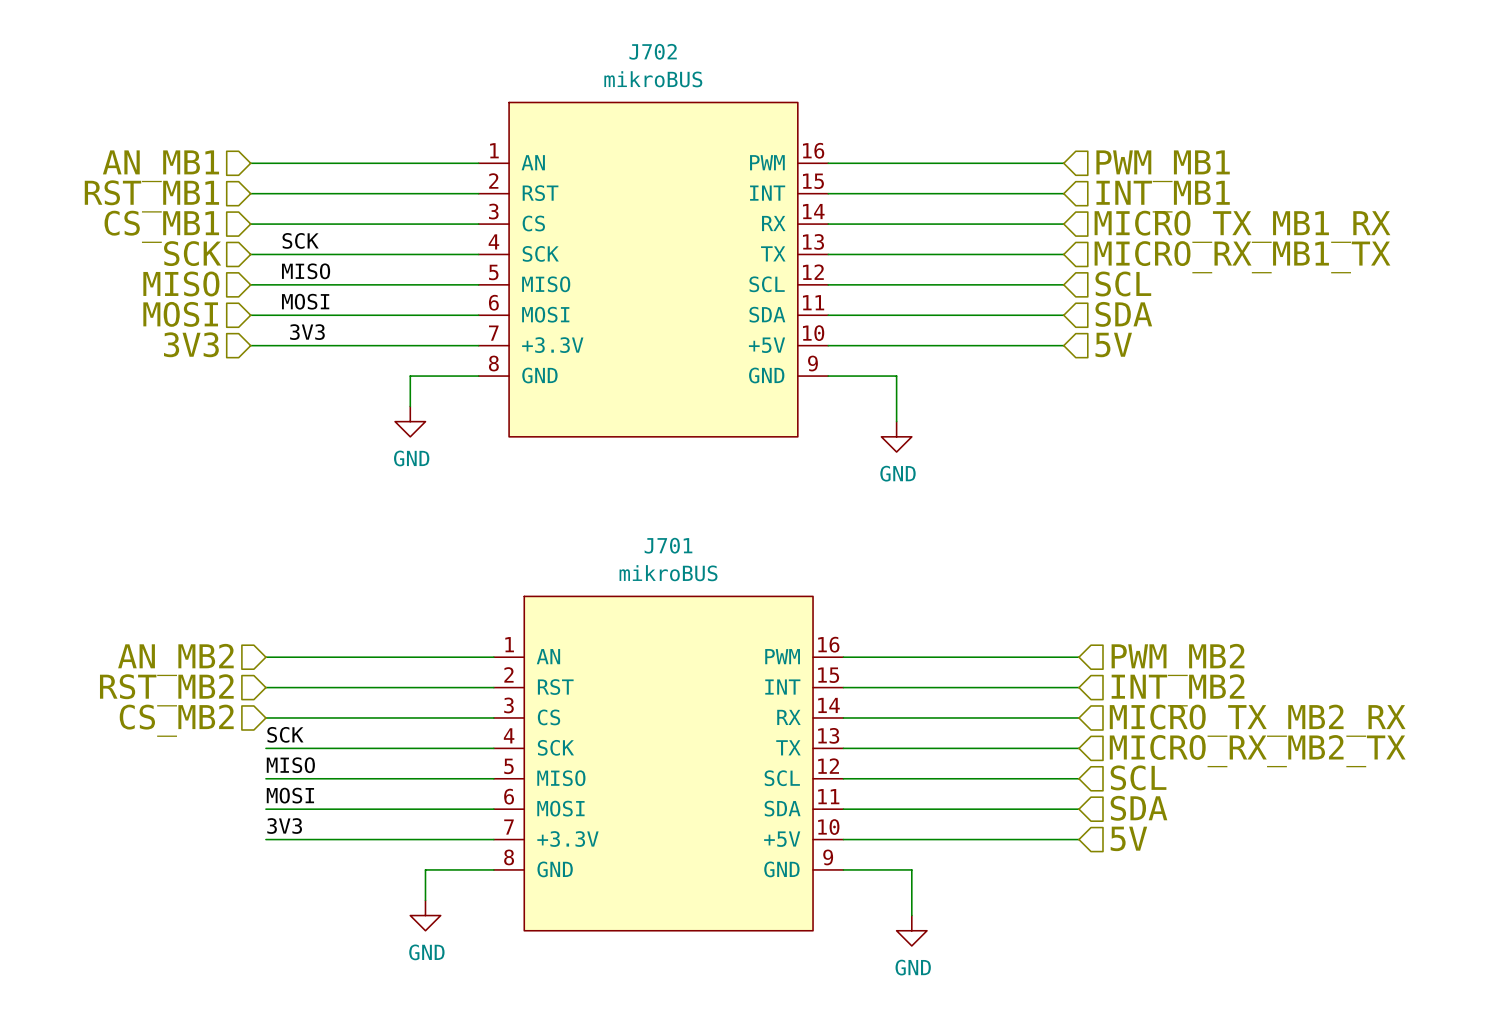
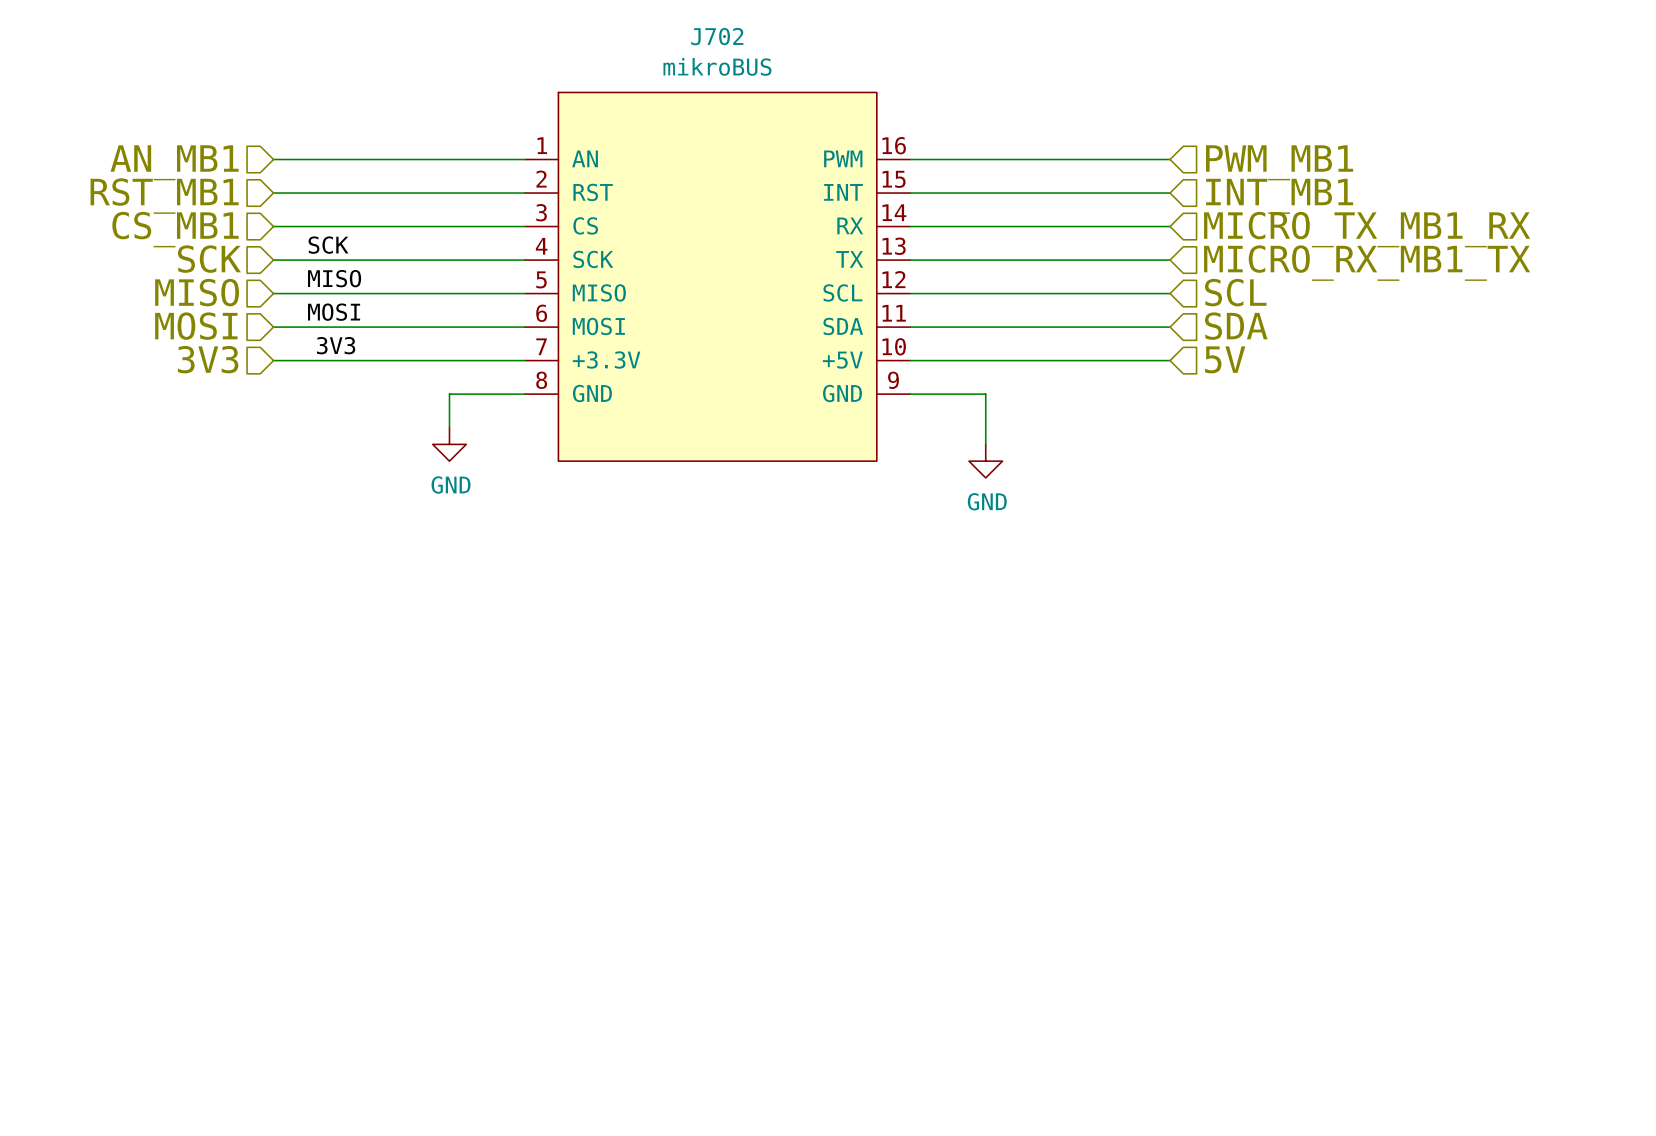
wire: (265, 657) (493, 657) -> none
wire: (843, 657) (1078, 657) -> none
hierarchical label: AN_MB2 (175, 659) -> none
hierarchical label: PWM_MB2 (1178, 659) -> none
wire: (265, 687) (493, 687) -> none
wire: (843, 687) (1078, 687) -> none
hierarchical label: RST_MB2 (166, 690) -> none
hierarchical label: INT_MB2 (1178, 690) -> none
wire: (265, 717) (493, 717) -> none
wire: (843, 717) (1078, 717) -> none
hierarchical label: CS_MB2 (176, 720) -> none
hierarchical label: MICRO_TX_MB2_RX (1257, 720) -> none
label: SCK (285, 734) -> none
wire: (265, 748) (493, 748) -> none
wire: (843, 748) (1078, 748) -> none
hierarchical label: MICRO_RX_MB2_TX (1257, 751) -> none
J701: mikroBUS (668, 763) -> none
label: MISO (290, 765) -> none
hierarchical label: SCL (1138, 777) -> none
wire: (265, 778) (493, 778) -> none
wire: (843, 778) (1078, 778) -> none
label: MOSI (290, 795) -> none
hierarchical label: SDA (1138, 808) -> none
wire: (265, 809) (493, 809) -> none
wire: (843, 809) (1078, 809) -> none
label: 3V3 (284, 826) -> none
hierarchical label: 5V (1128, 838) -> none
wire: (265, 839) (493, 839) -> none
wire: (843, 839) (1078, 839) -> none
wire: (493, 869) (425, 869) (425, 900) -> none
wire: (843, 869) (911, 869) (911, 915) -> none
power symbol: GND (425, 915) -> none
power symbol: GND (911, 930) -> none

